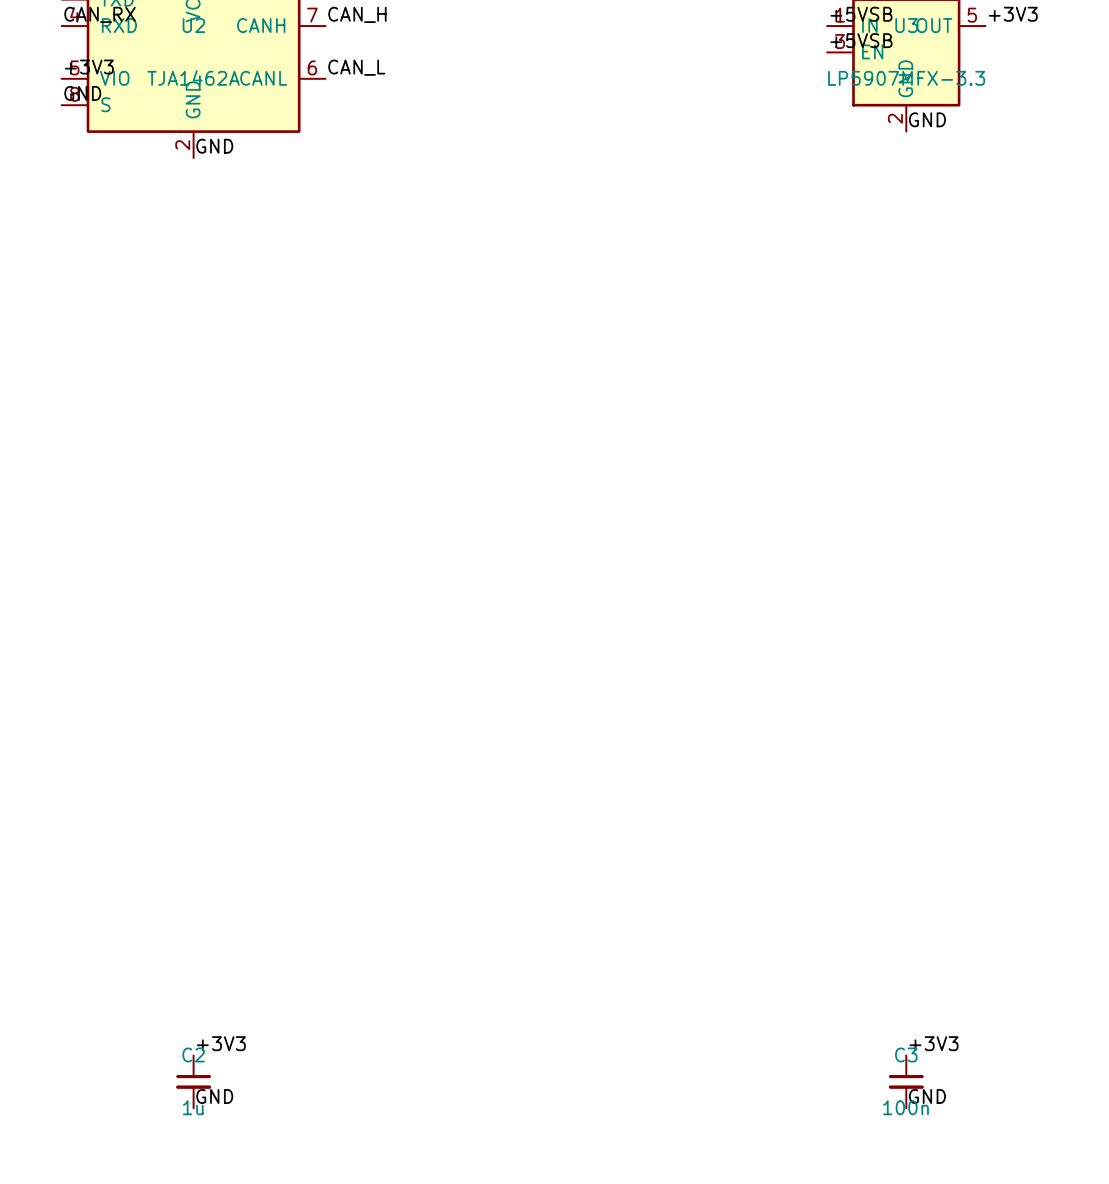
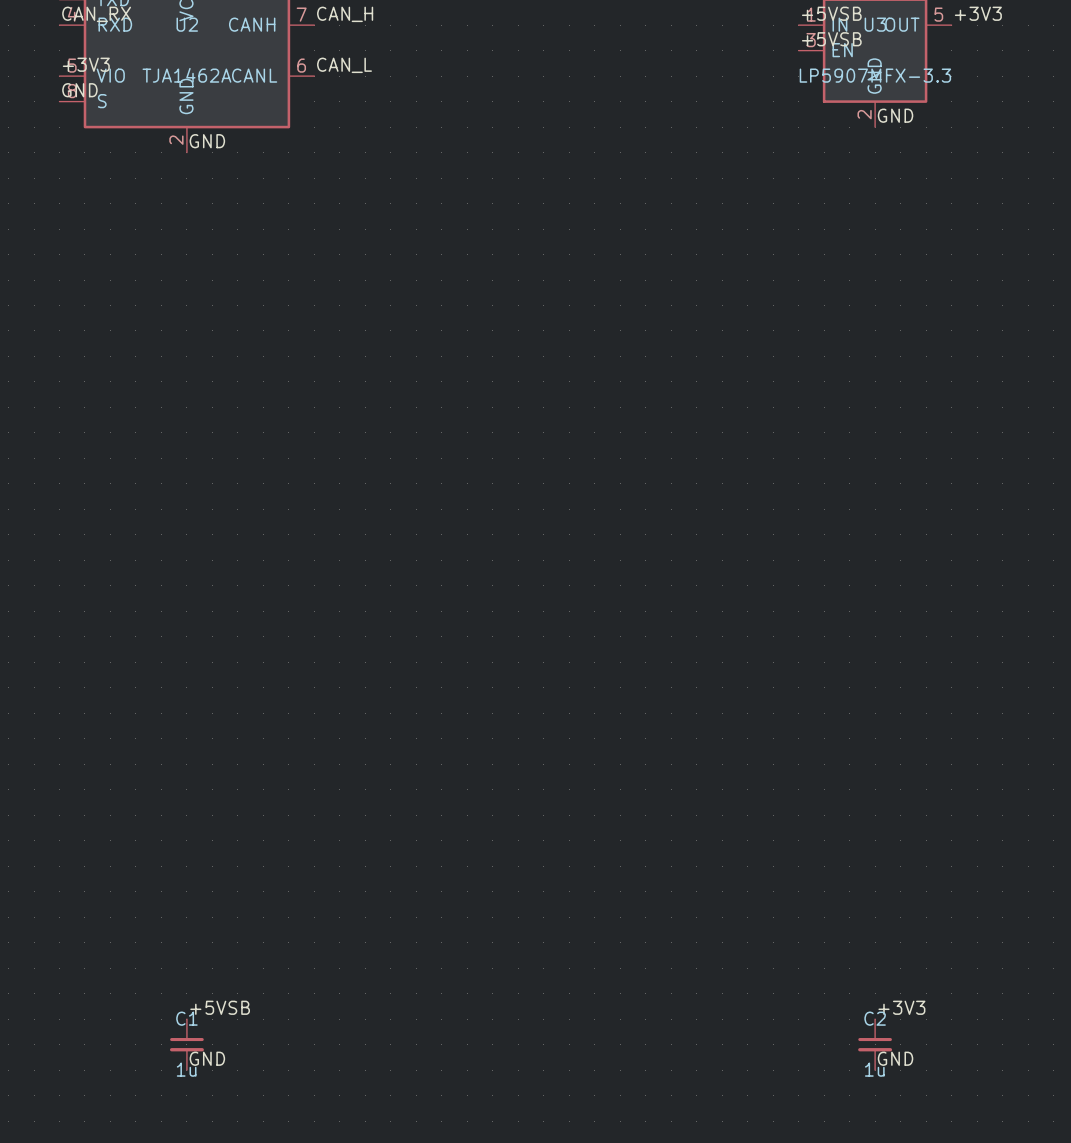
label: +3V3 (221, 1043) -> +5VSB (220, 1007)
C2 name: C2 (193, 1054) -> C1 (186, 1018)
C3 name: C3 (906, 1054) -> C2 (875, 1018)
C3 value: 100n (905, 1107) -> 1u (874, 1069)

